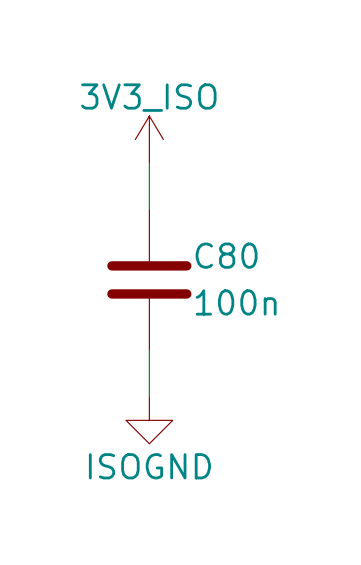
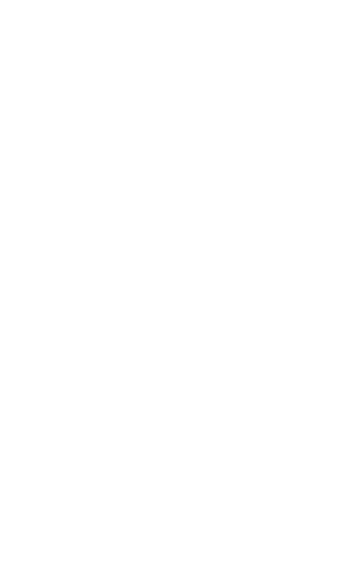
power symbol: 3V3_ISO (149, 139) -> none
wire: (149, 162) (149, 209) -> none
C80: 100n (149, 279) -> none
wire: (149, 350) (149, 396) -> none
power symbol: ISOGND (149, 420) -> none

